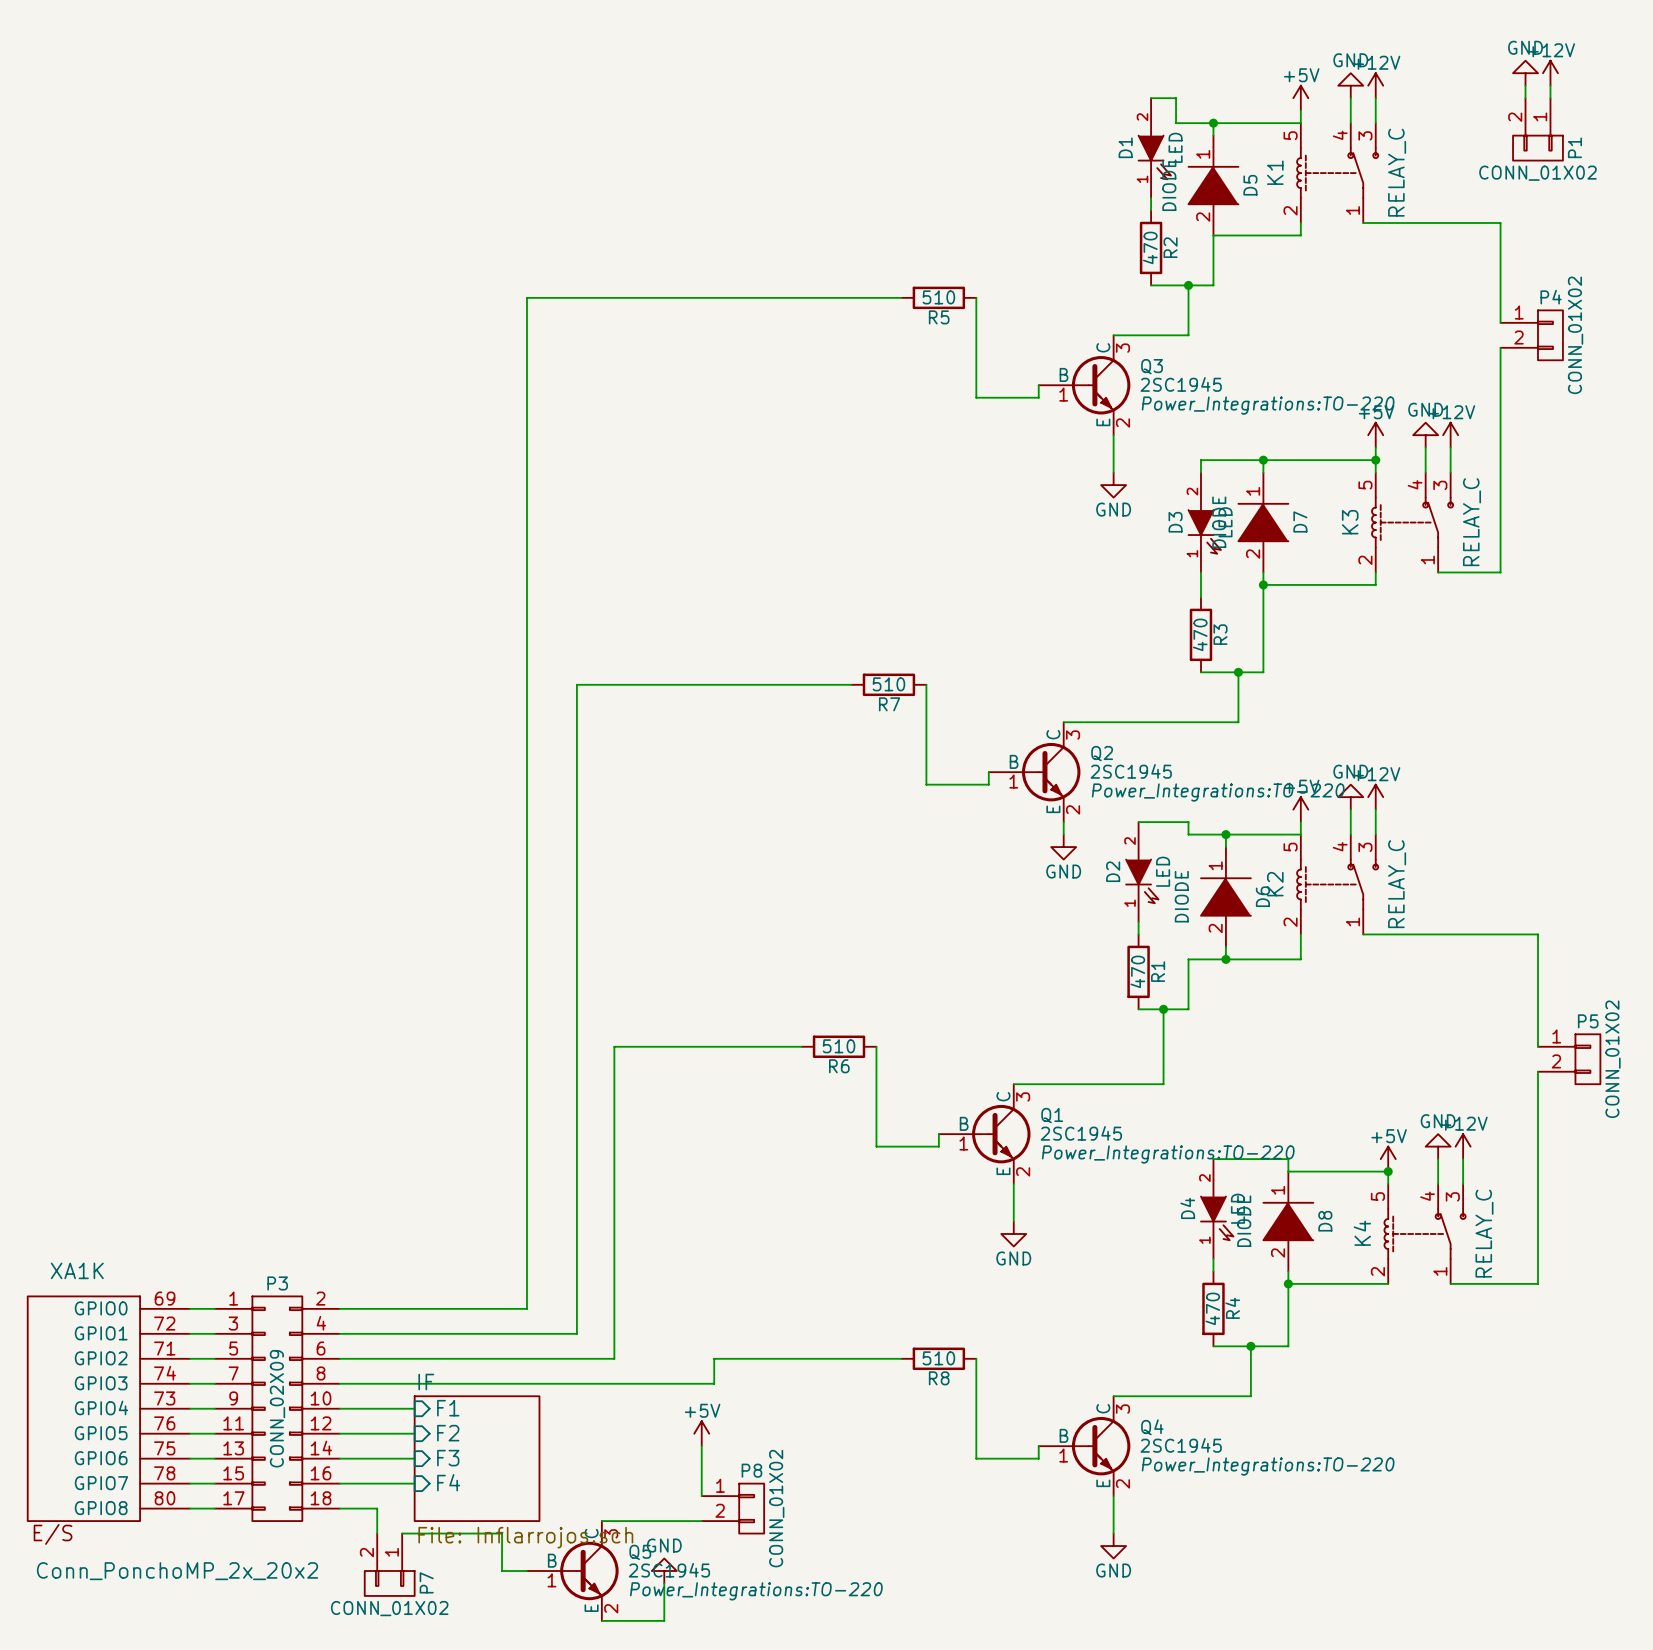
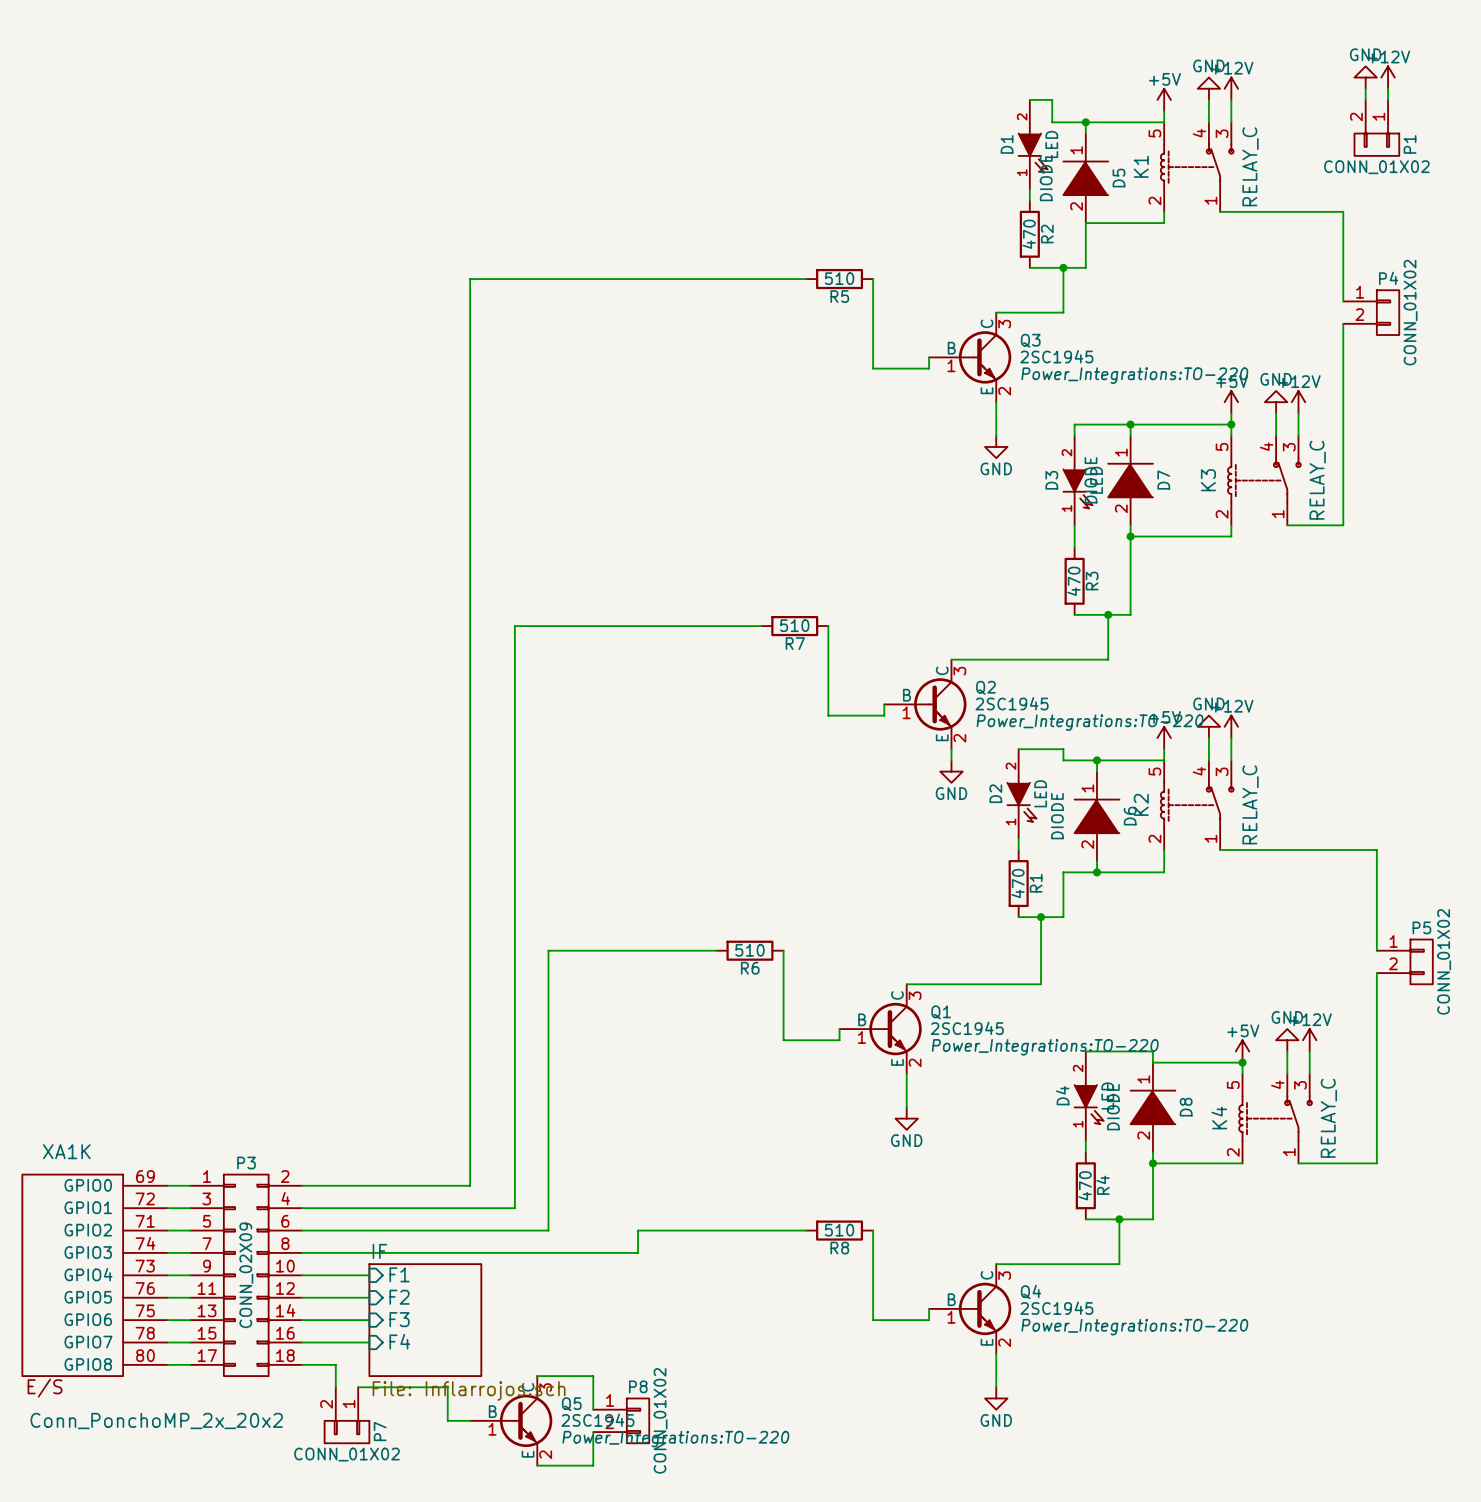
power symbol: +5V (701, 1433) -> none
wire: (701, 1446) (701, 1496) -> none
P8 position: (732, 1508) -> (621, 1420)
wire: (664, 1521) (701, 1521) -> (593, 1376) (593, 1409)
power symbol: GND (664, 1571) -> none

